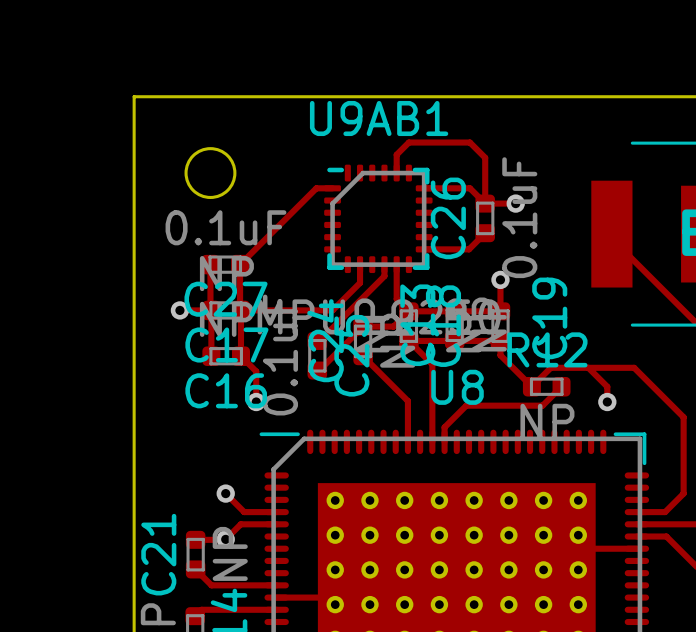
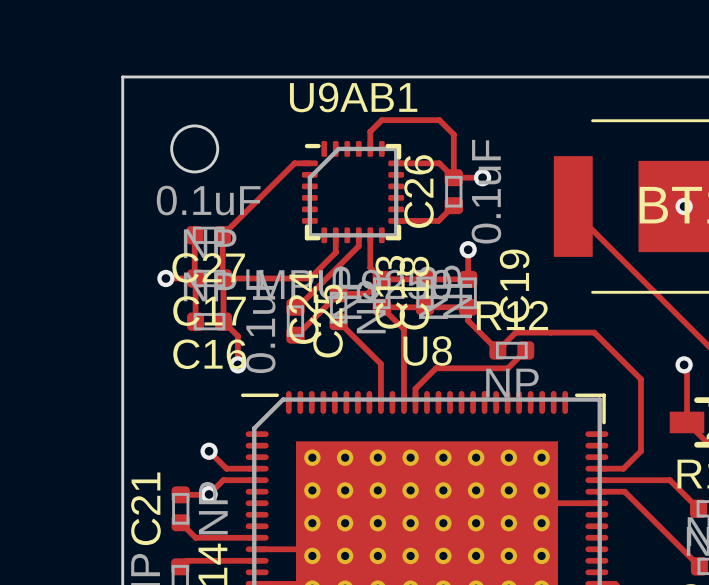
track: (588, 367) (607, 386) (607, 402) -> none
via: (607, 402) -> none

